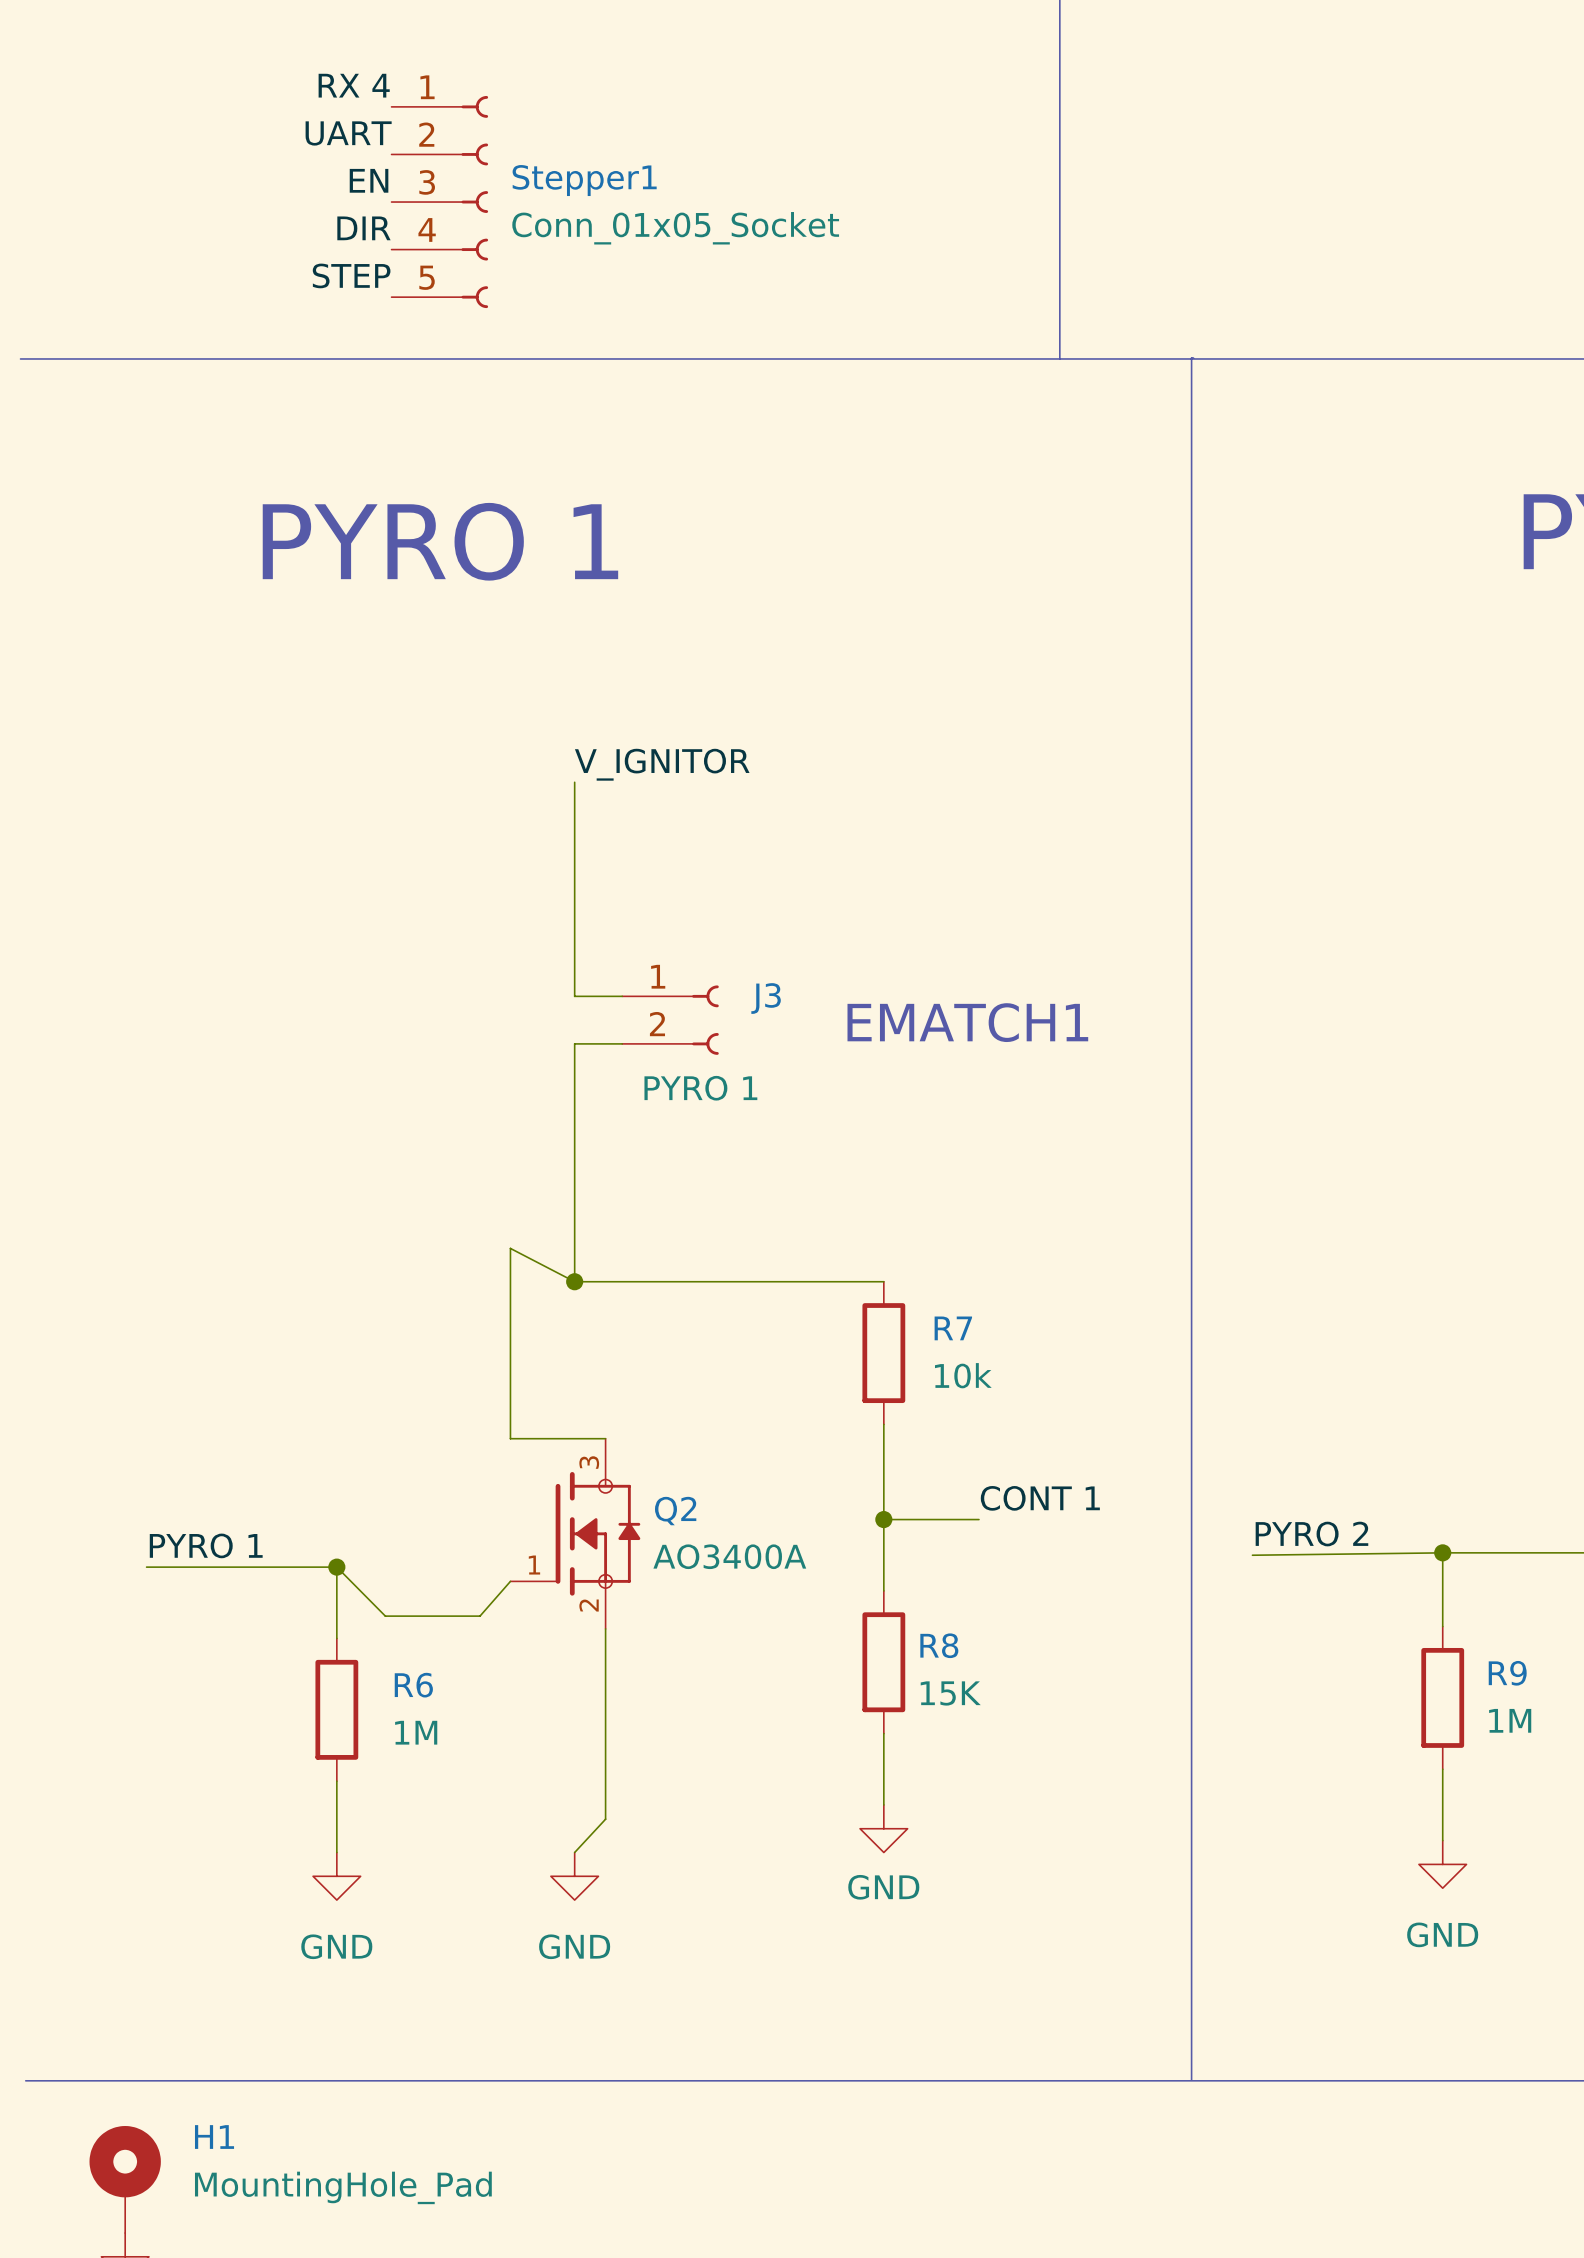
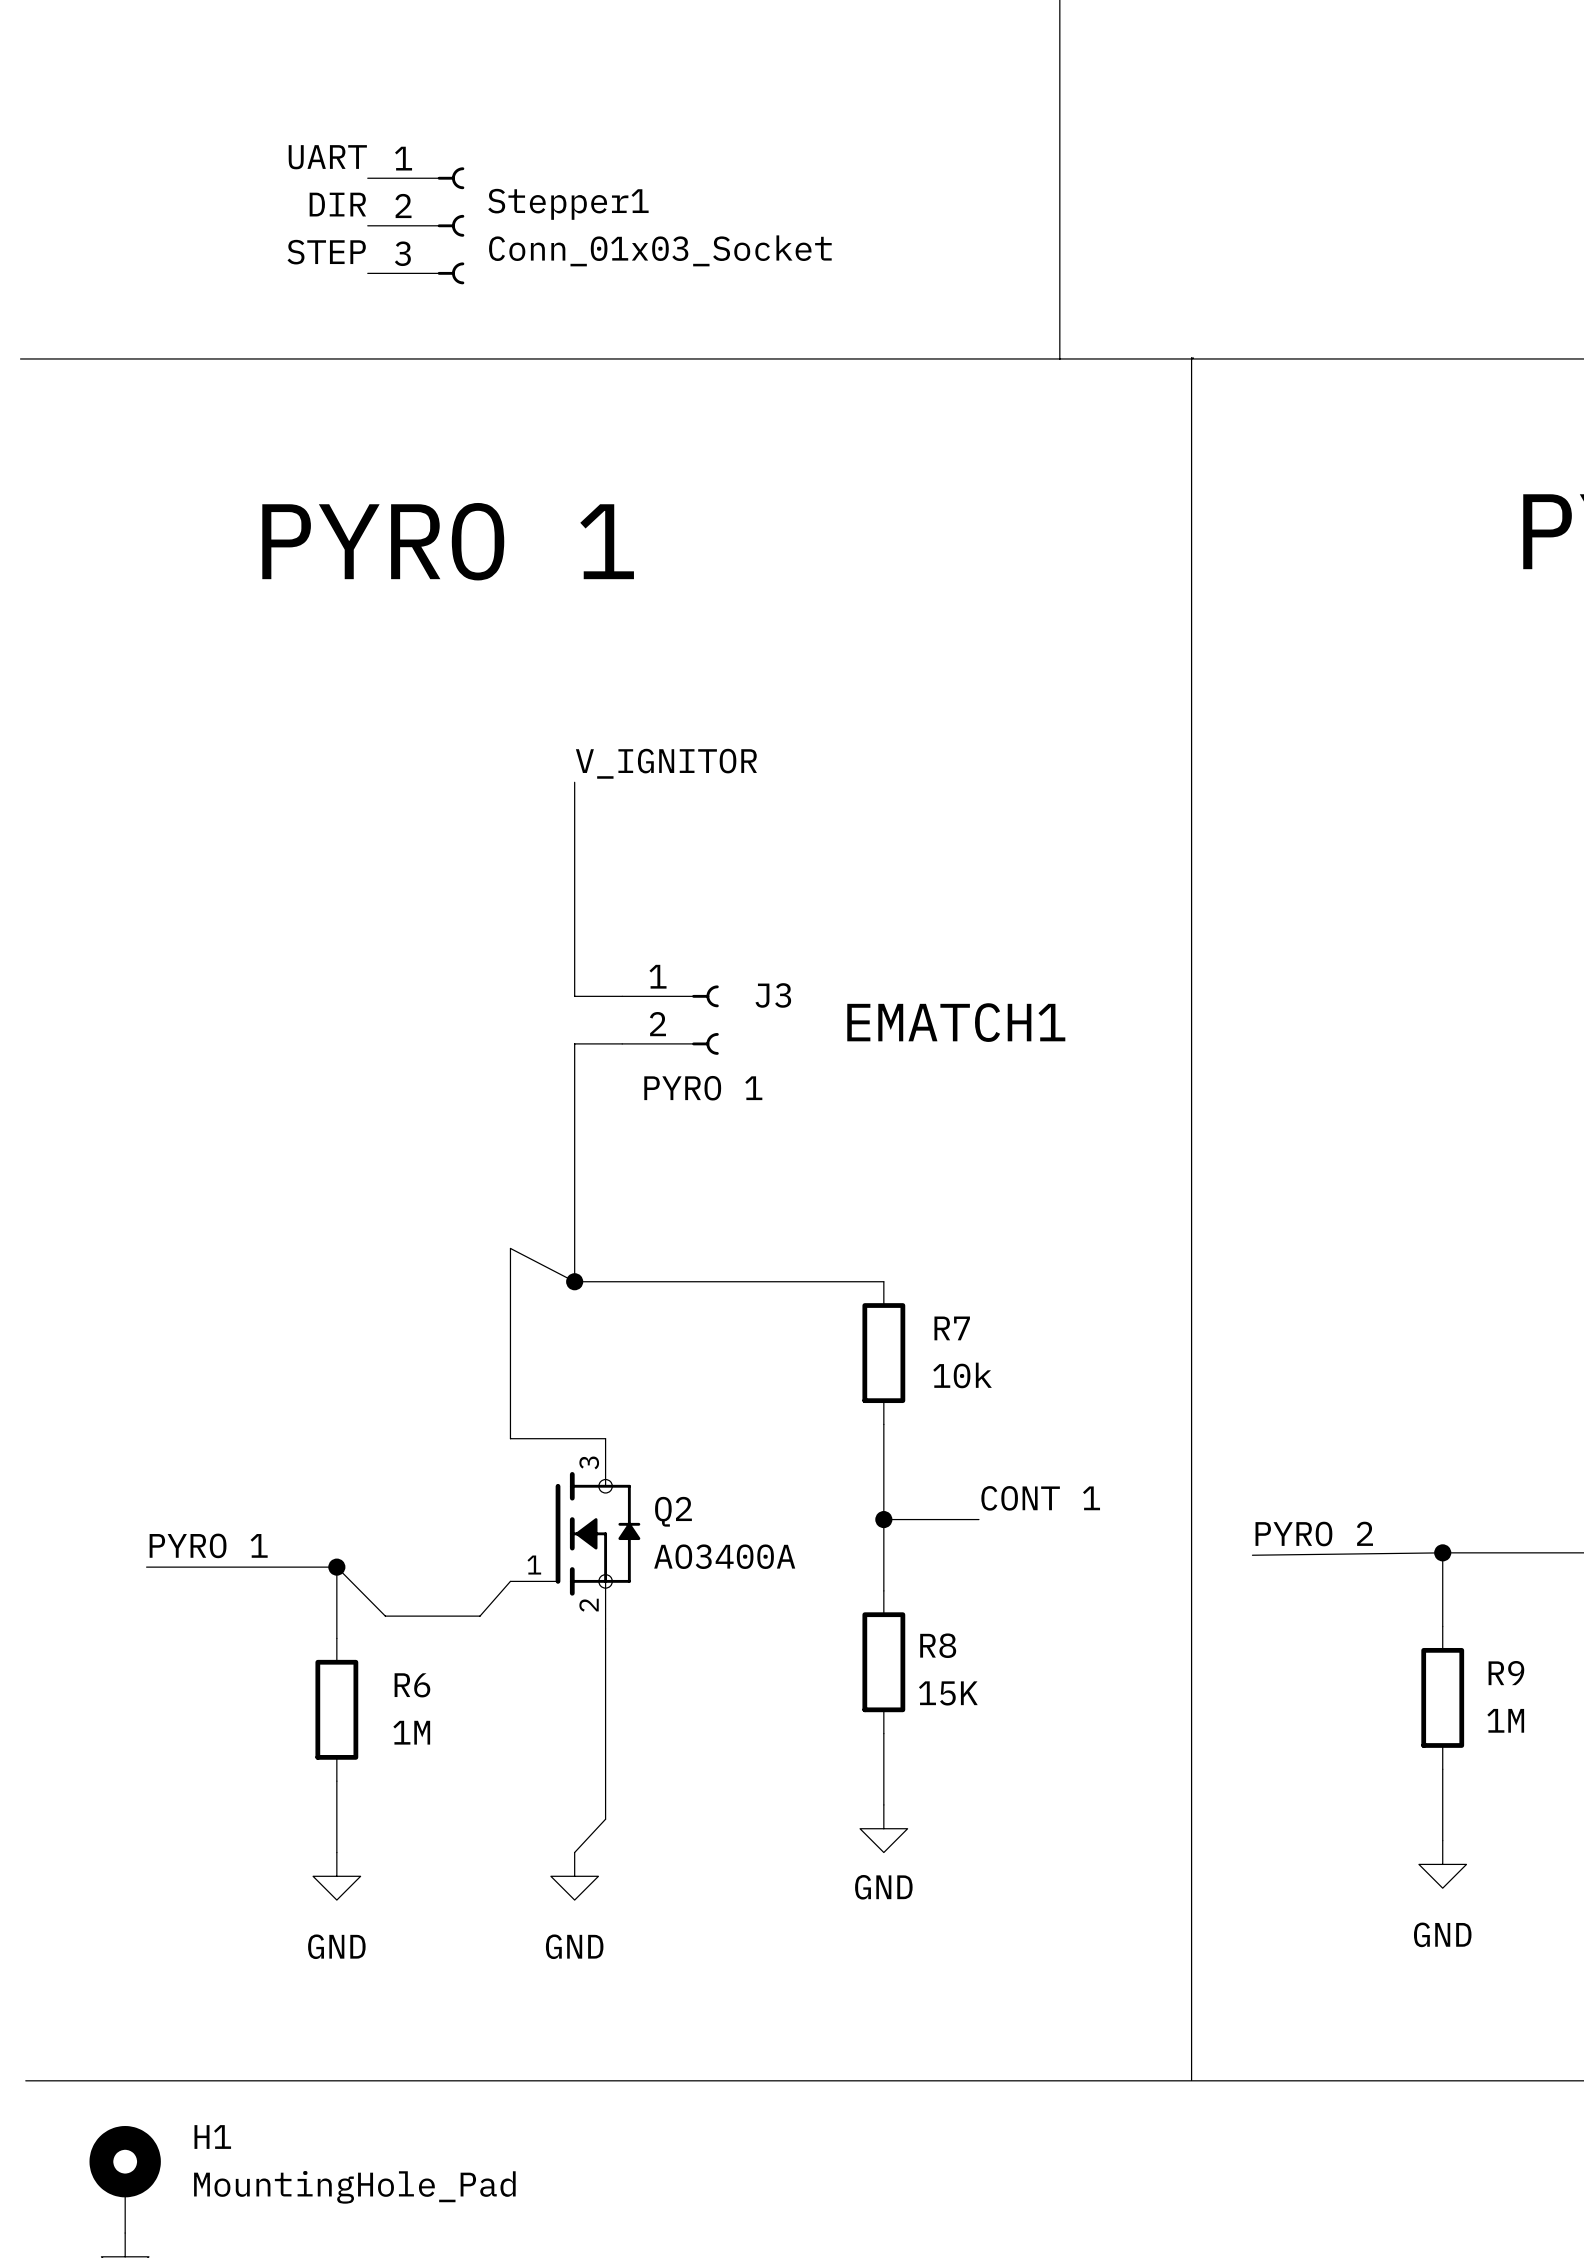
label: RX 4 (354, 85) -> none
Stepper1 symbol: [391, 95, 489, 309] -> [367, 167, 465, 285]
label position: UART (348, 133) -> UART (327, 157)
label: EN (369, 180) -> none
label position: DIR (363, 228) -> DIR (337, 204)
Stepper1 value: Conn_01x05_Socket (675, 228) -> Conn_01x03_Socket (660, 250)
label position: STEP (351, 275) -> STEP (326, 252)

